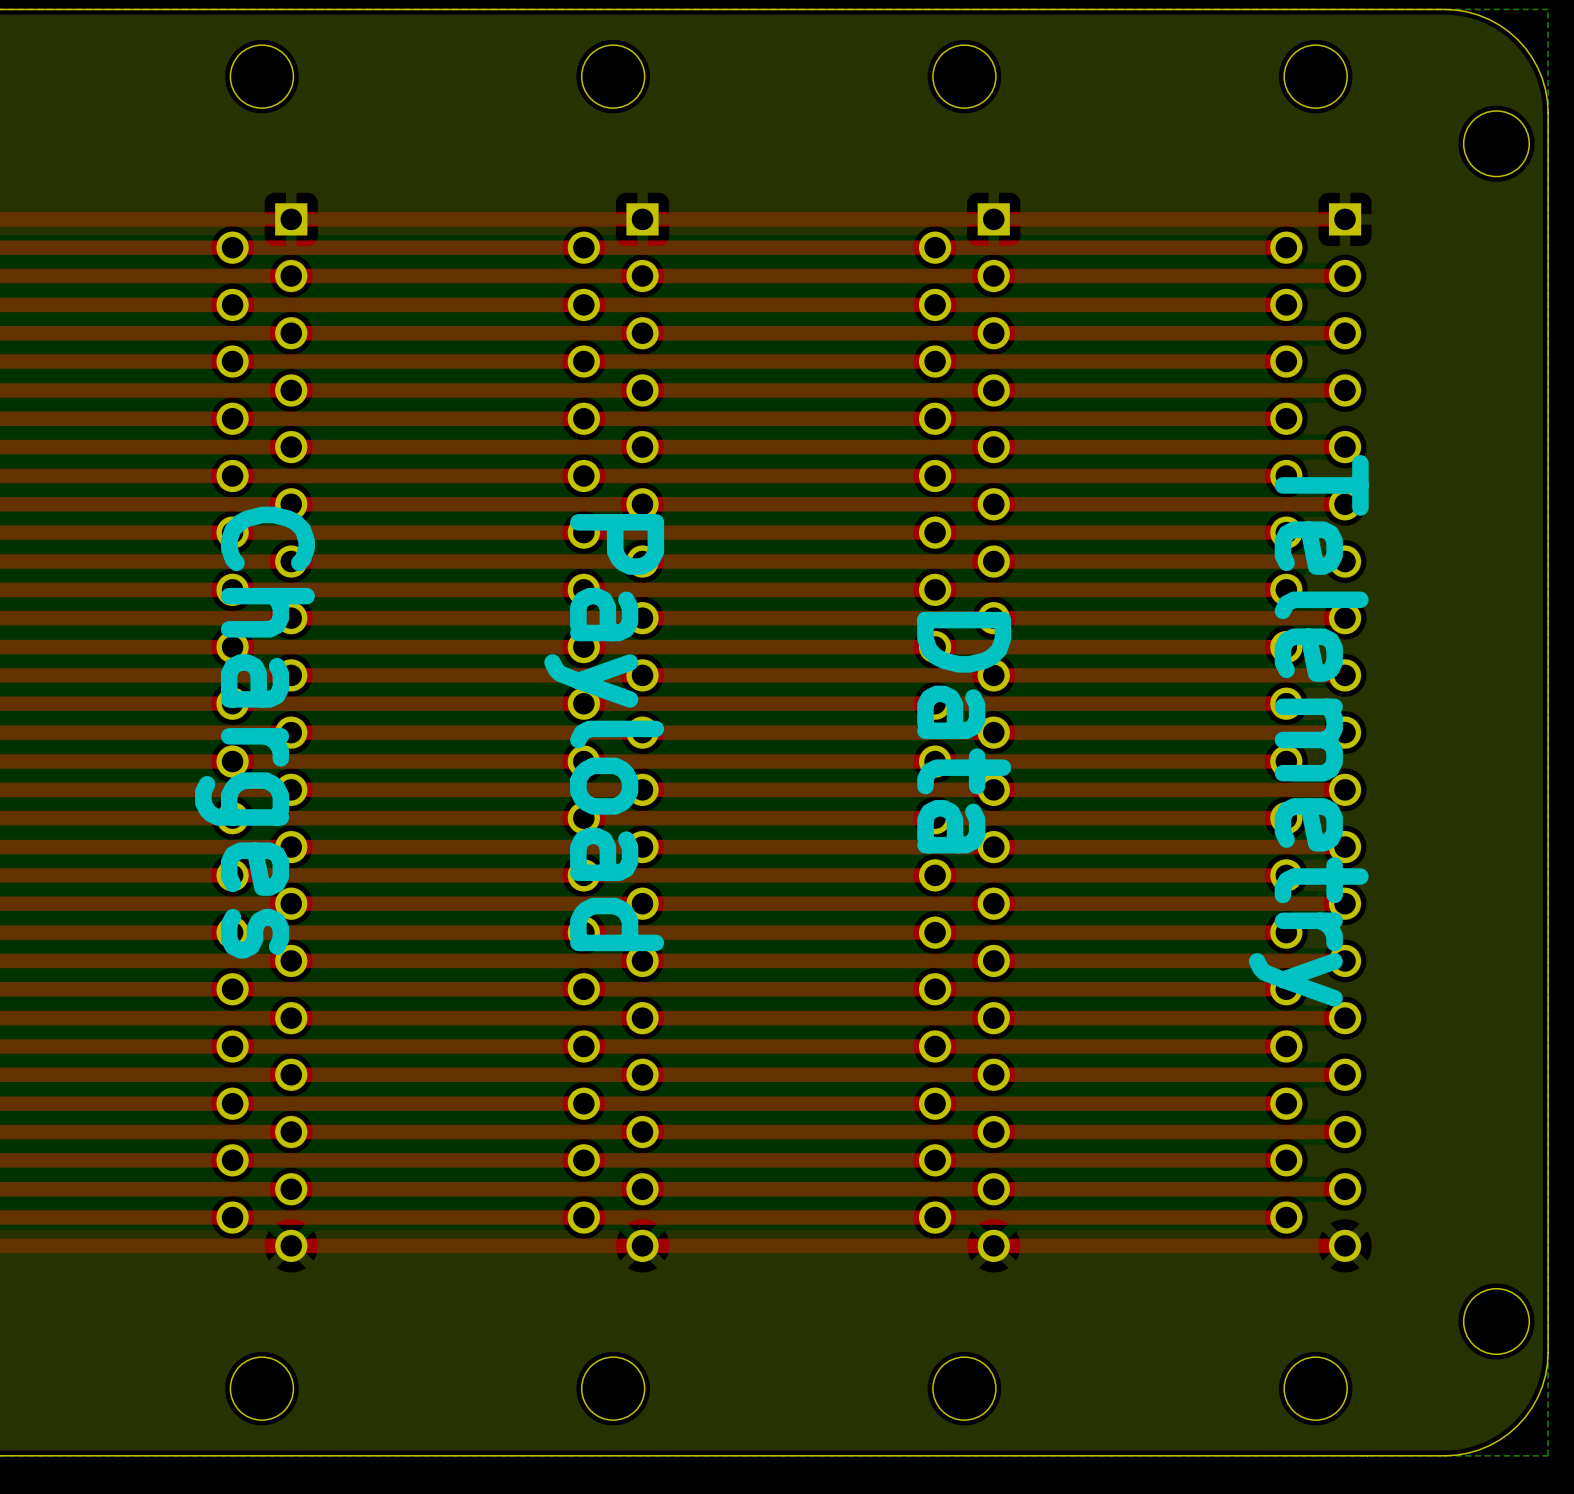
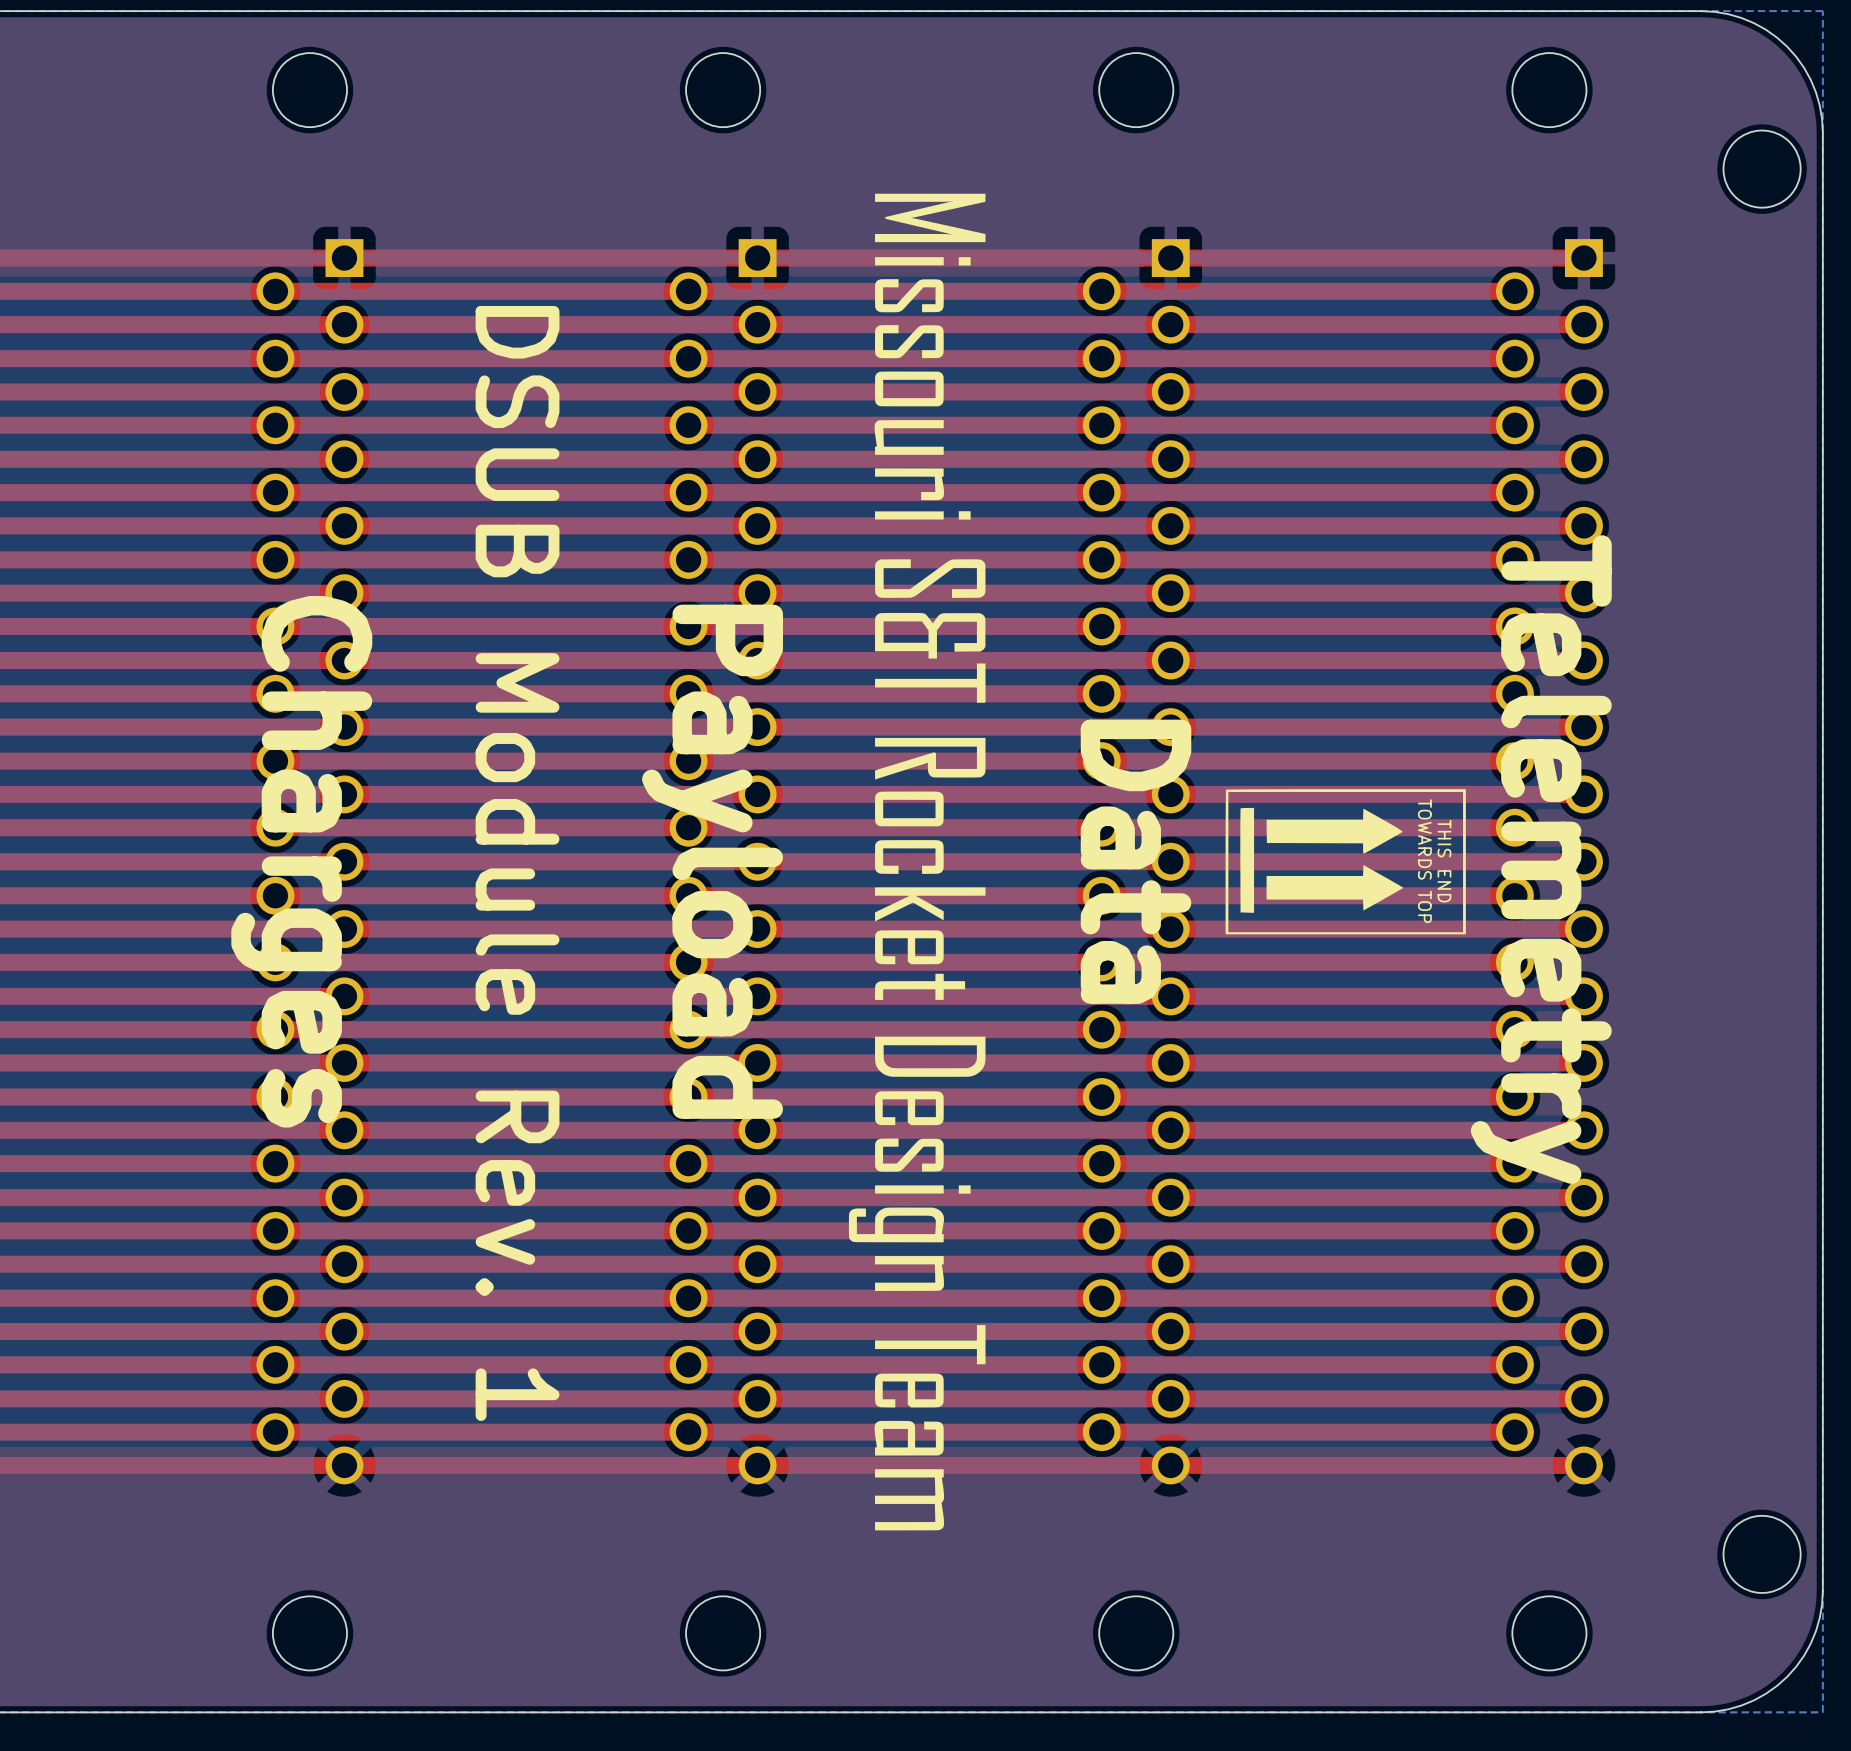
drawing: none -> [848, 193, 986, 1531]
drawing: none -> [1225, 789, 1466, 935]
text: none -> TOWARDS TOP (1424, 861)
text: none -> THIS END (1444, 861)
text: none -> DSUB Module Rev. 1 (517, 863)

